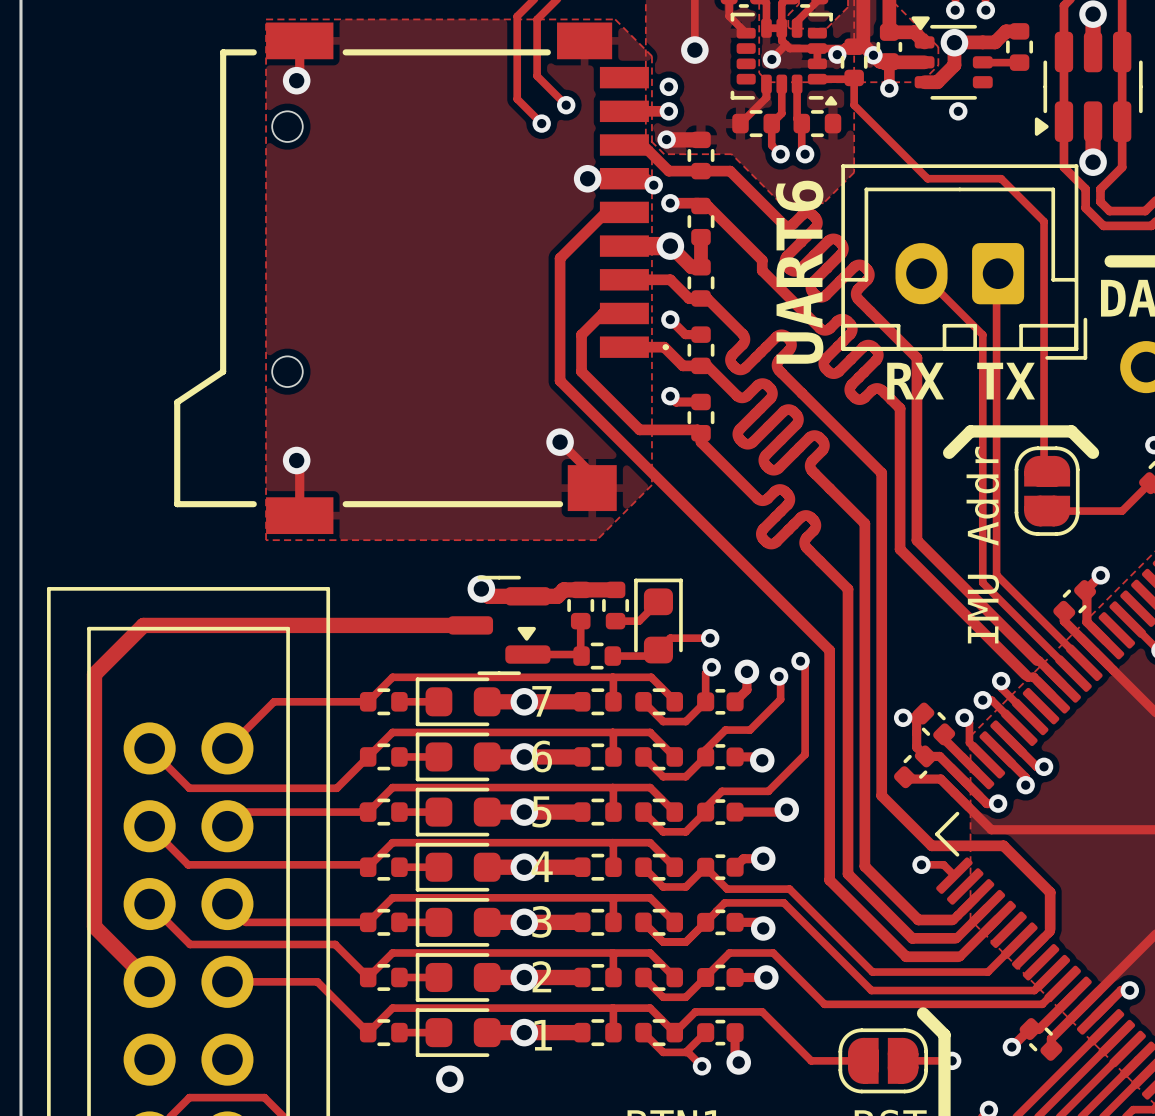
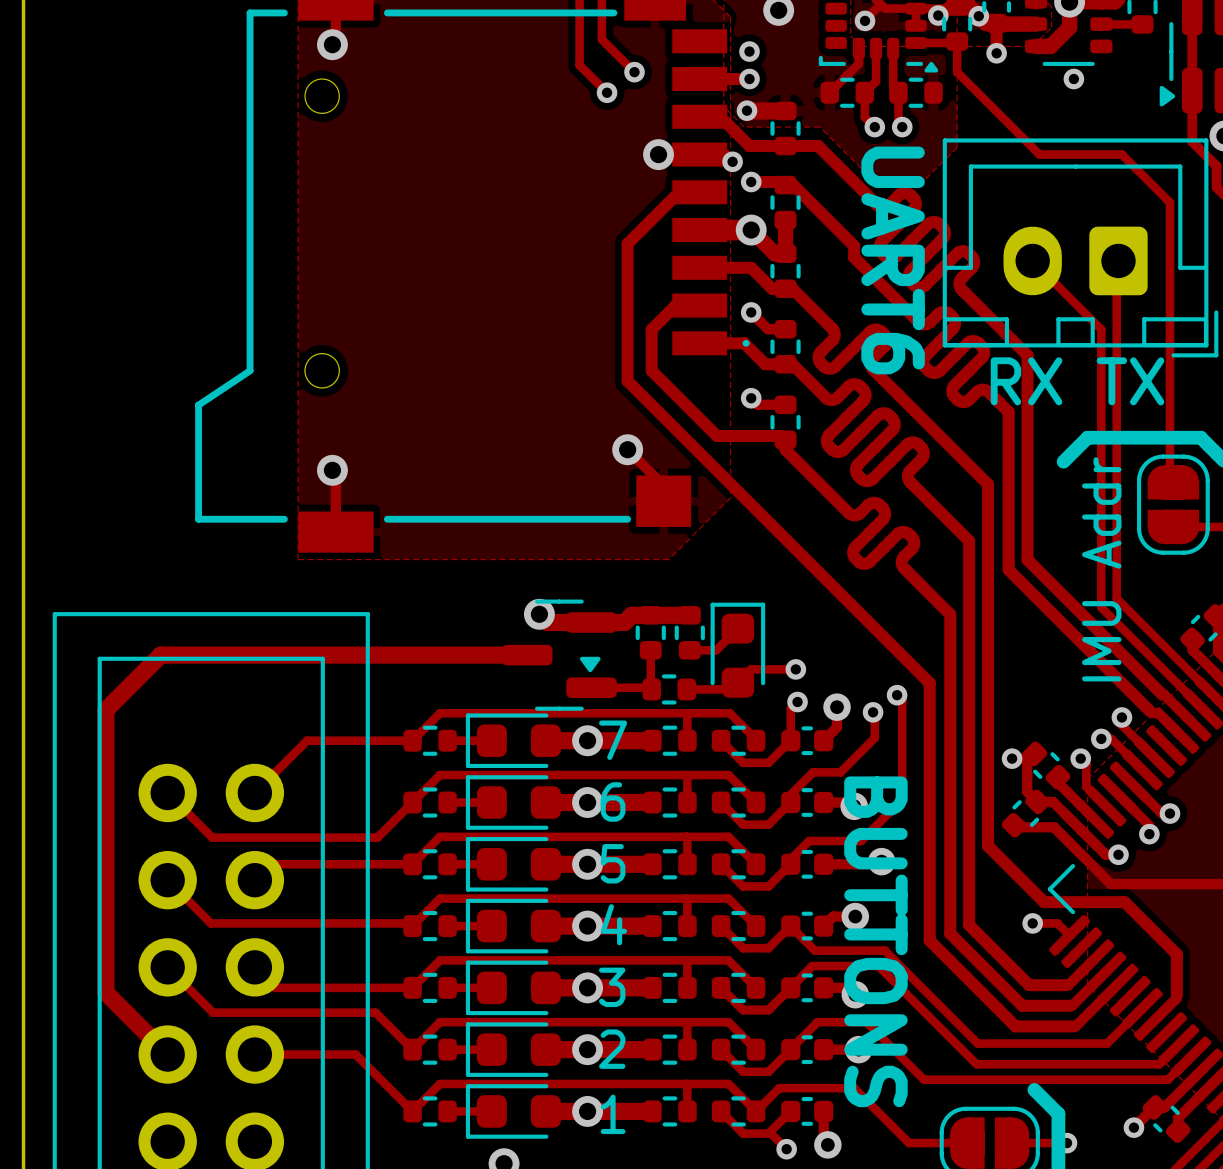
text rotation: 0° (799, 272) -> 180° (893, 260)
text: none -> BUTTONS (875, 941)

